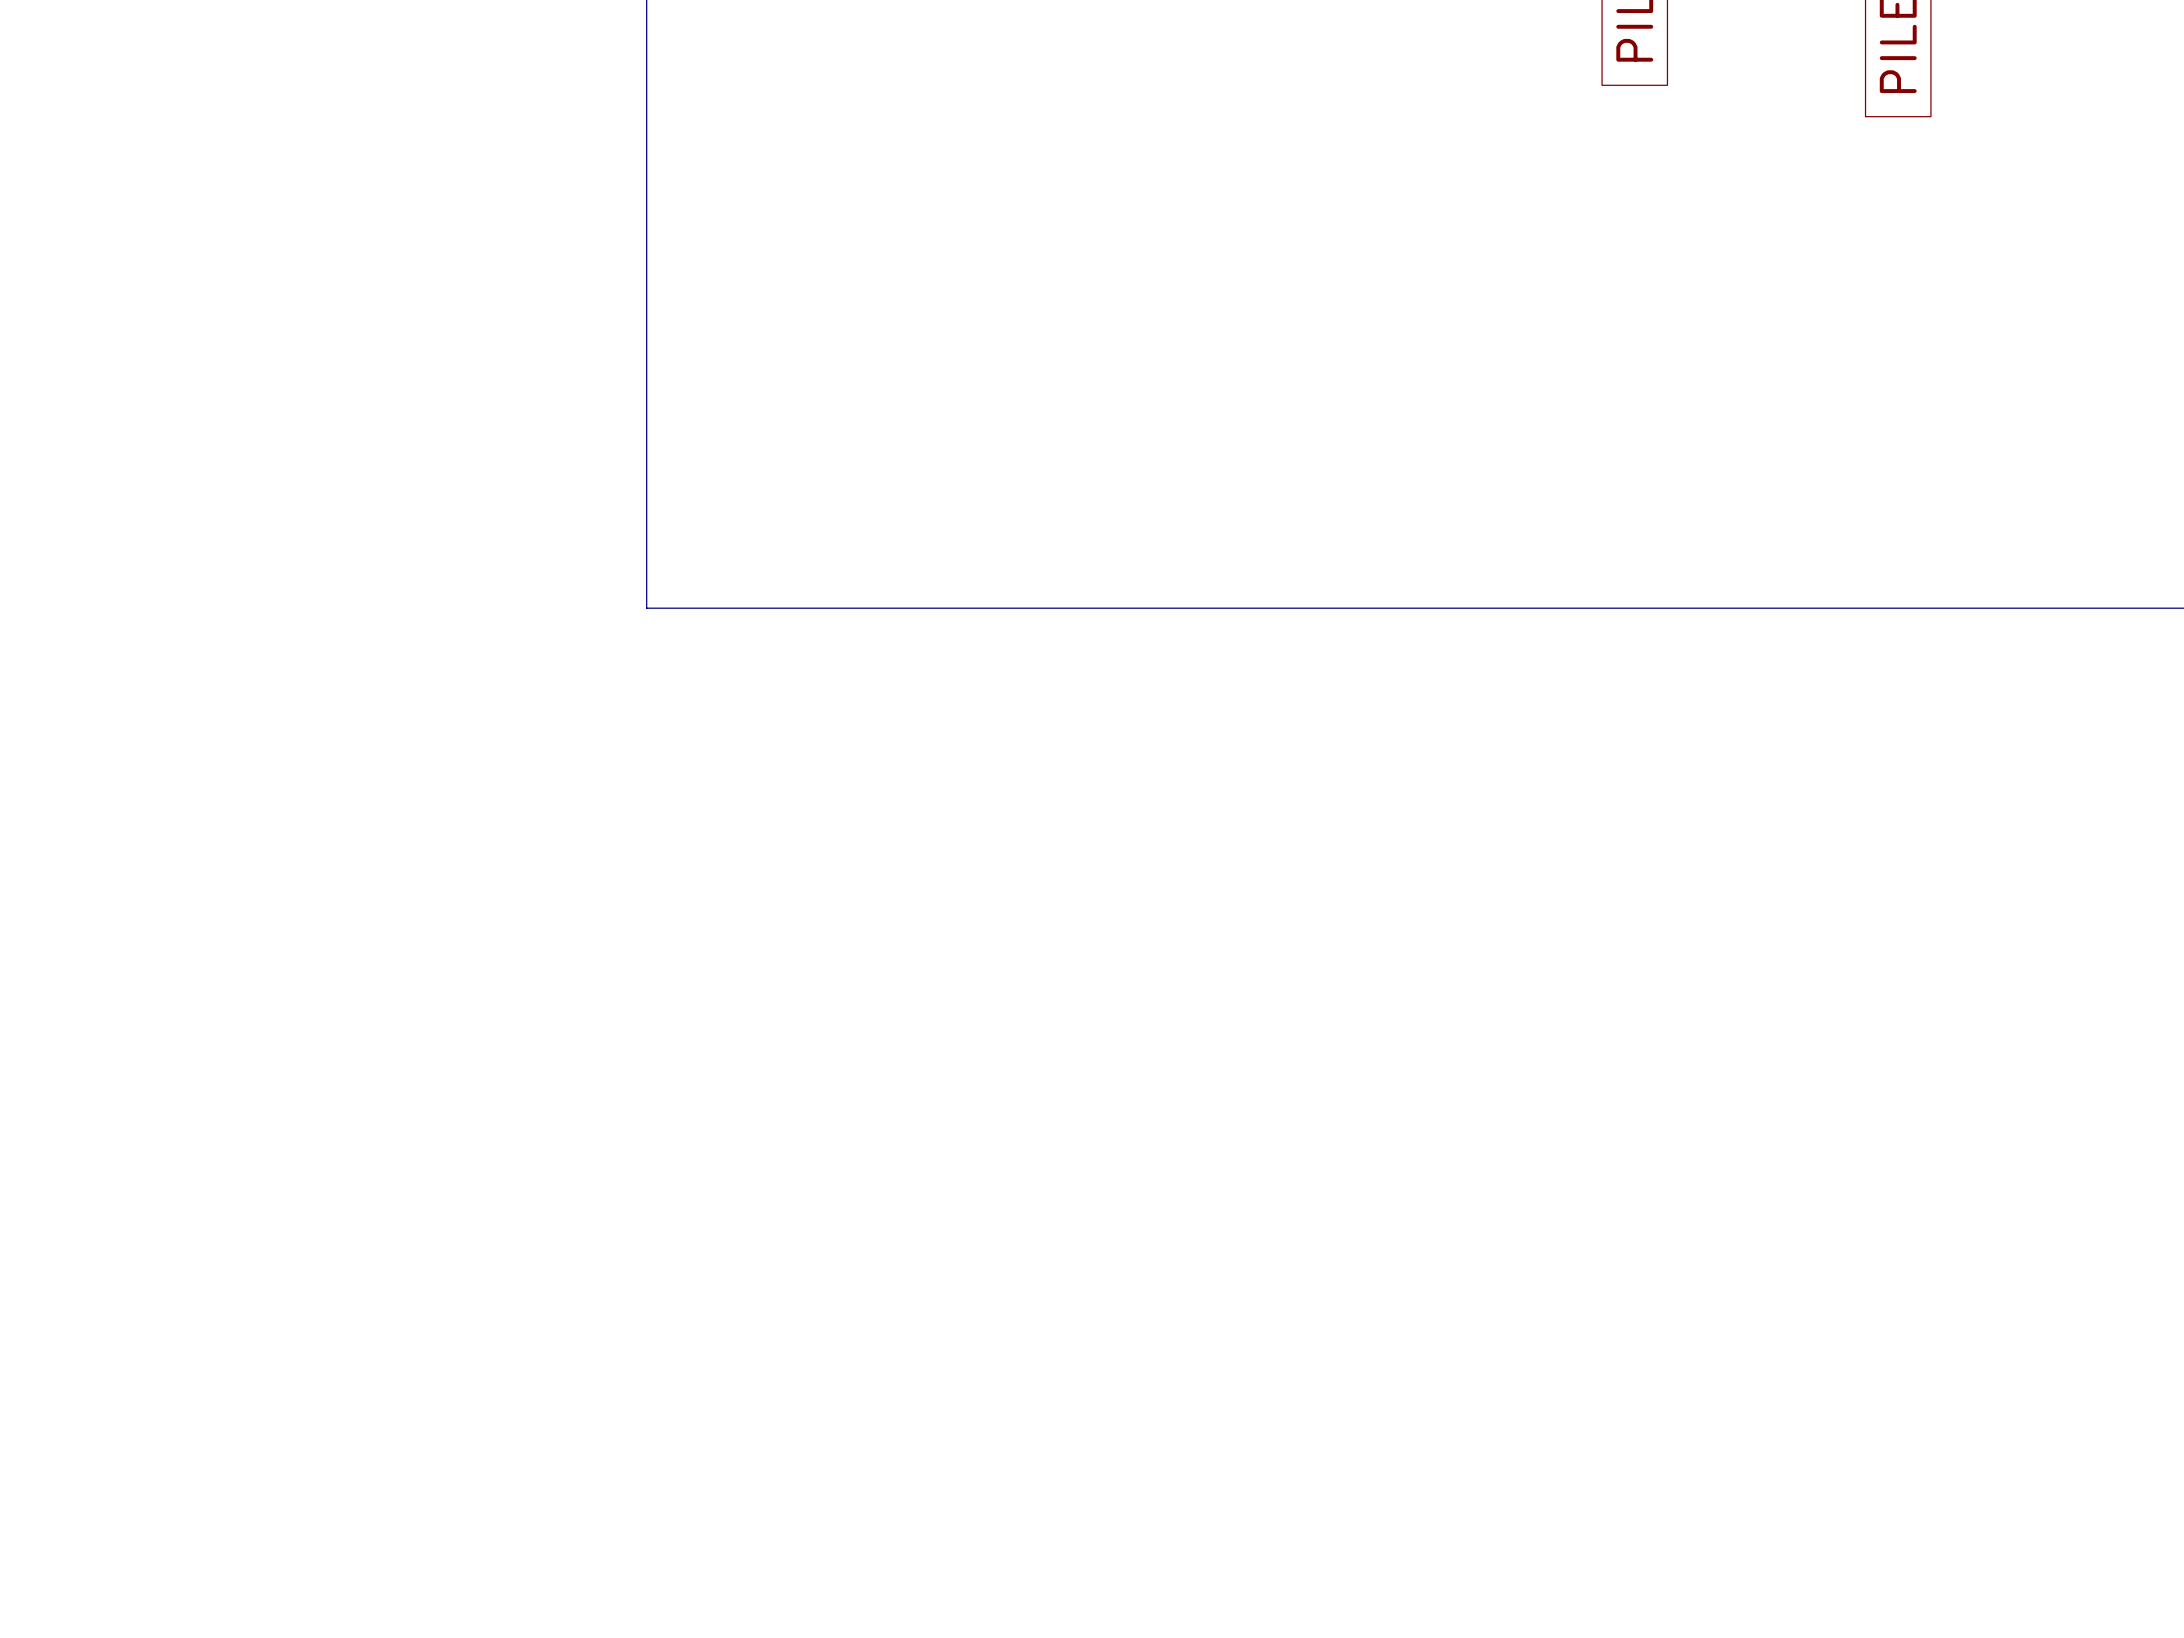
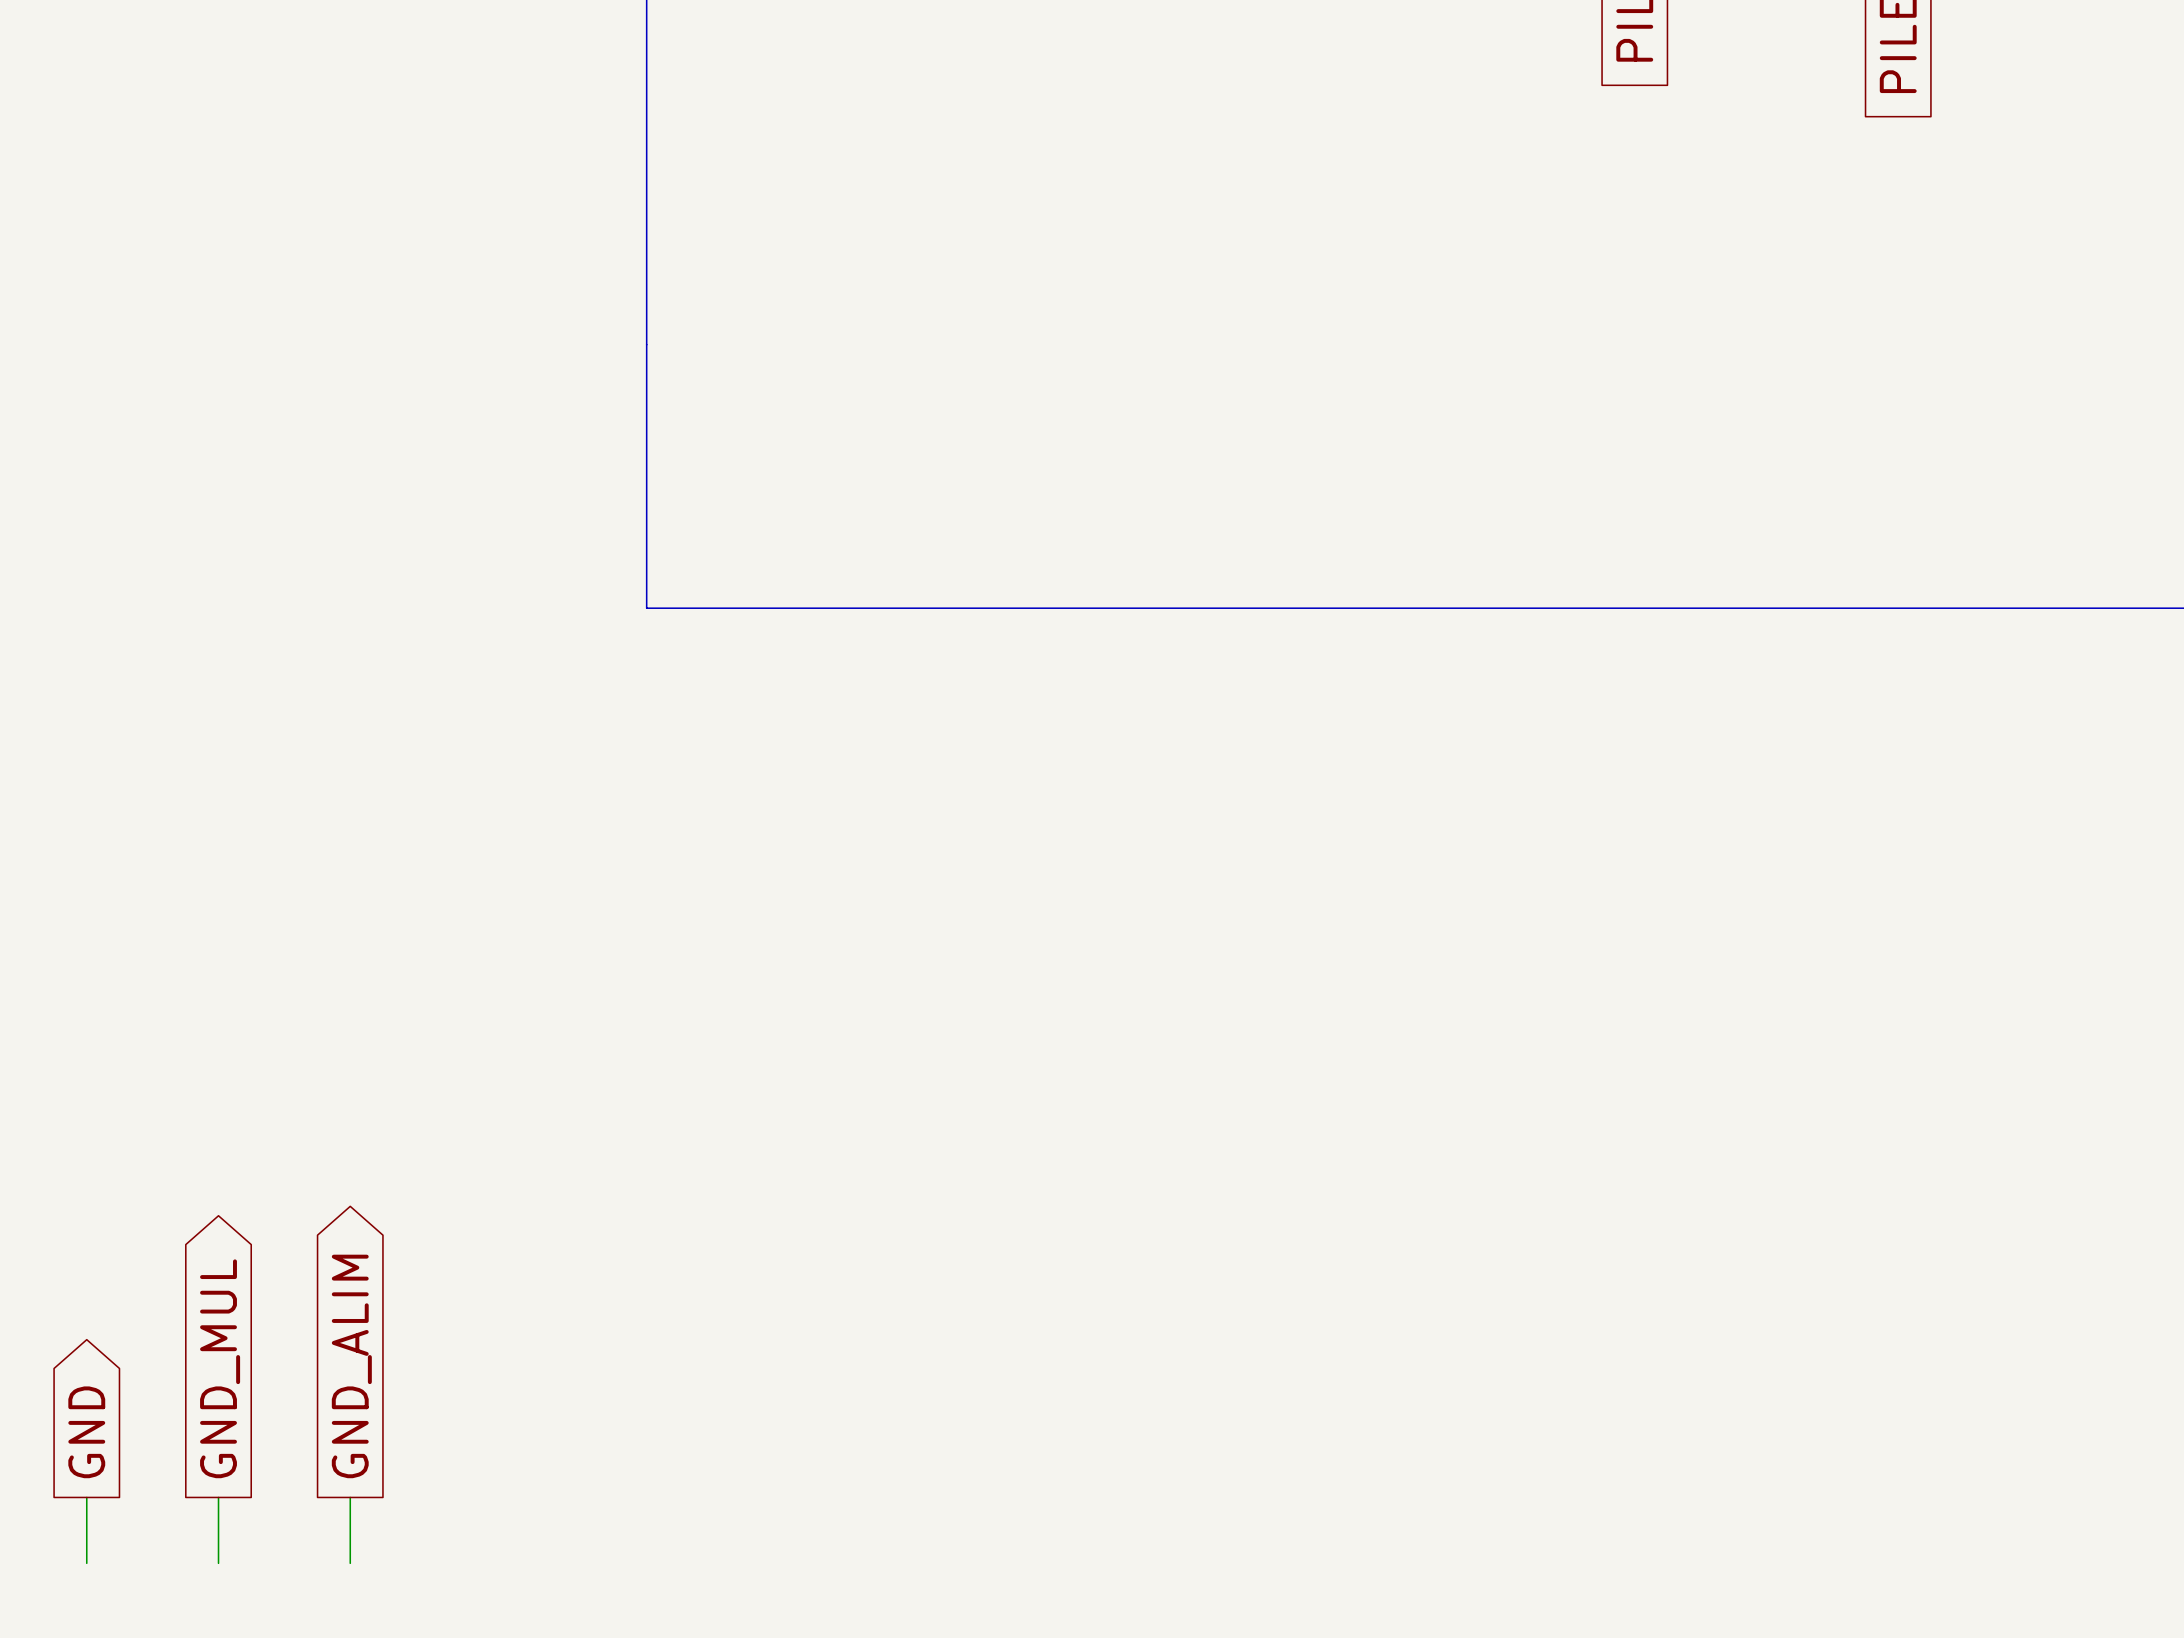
global label: none -> GND_ALIM (351, 1366)
global label: none -> GND_MUL (220, 1368)
global label: none -> GND (86, 1432)
wire: none -> (86, 1497) (86, 1563)
wire: none -> (218, 1497) (218, 1563)
wire: none -> (350, 1497) (350, 1563)

